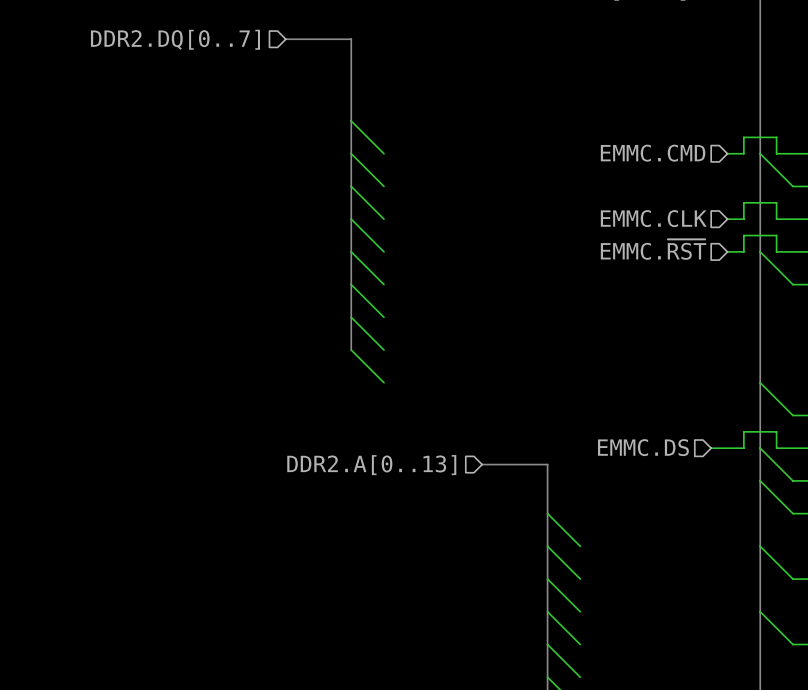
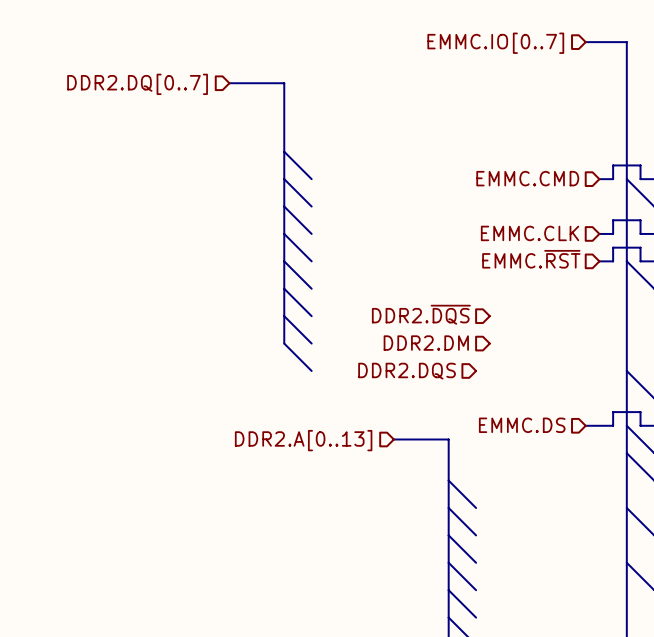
hierarchical label: none -> DDR2.~{DQS} (421, 314)
hierarchical label: none -> DDR2.DM (426, 343)
hierarchical label: none -> DDR2.DQS (407, 371)

